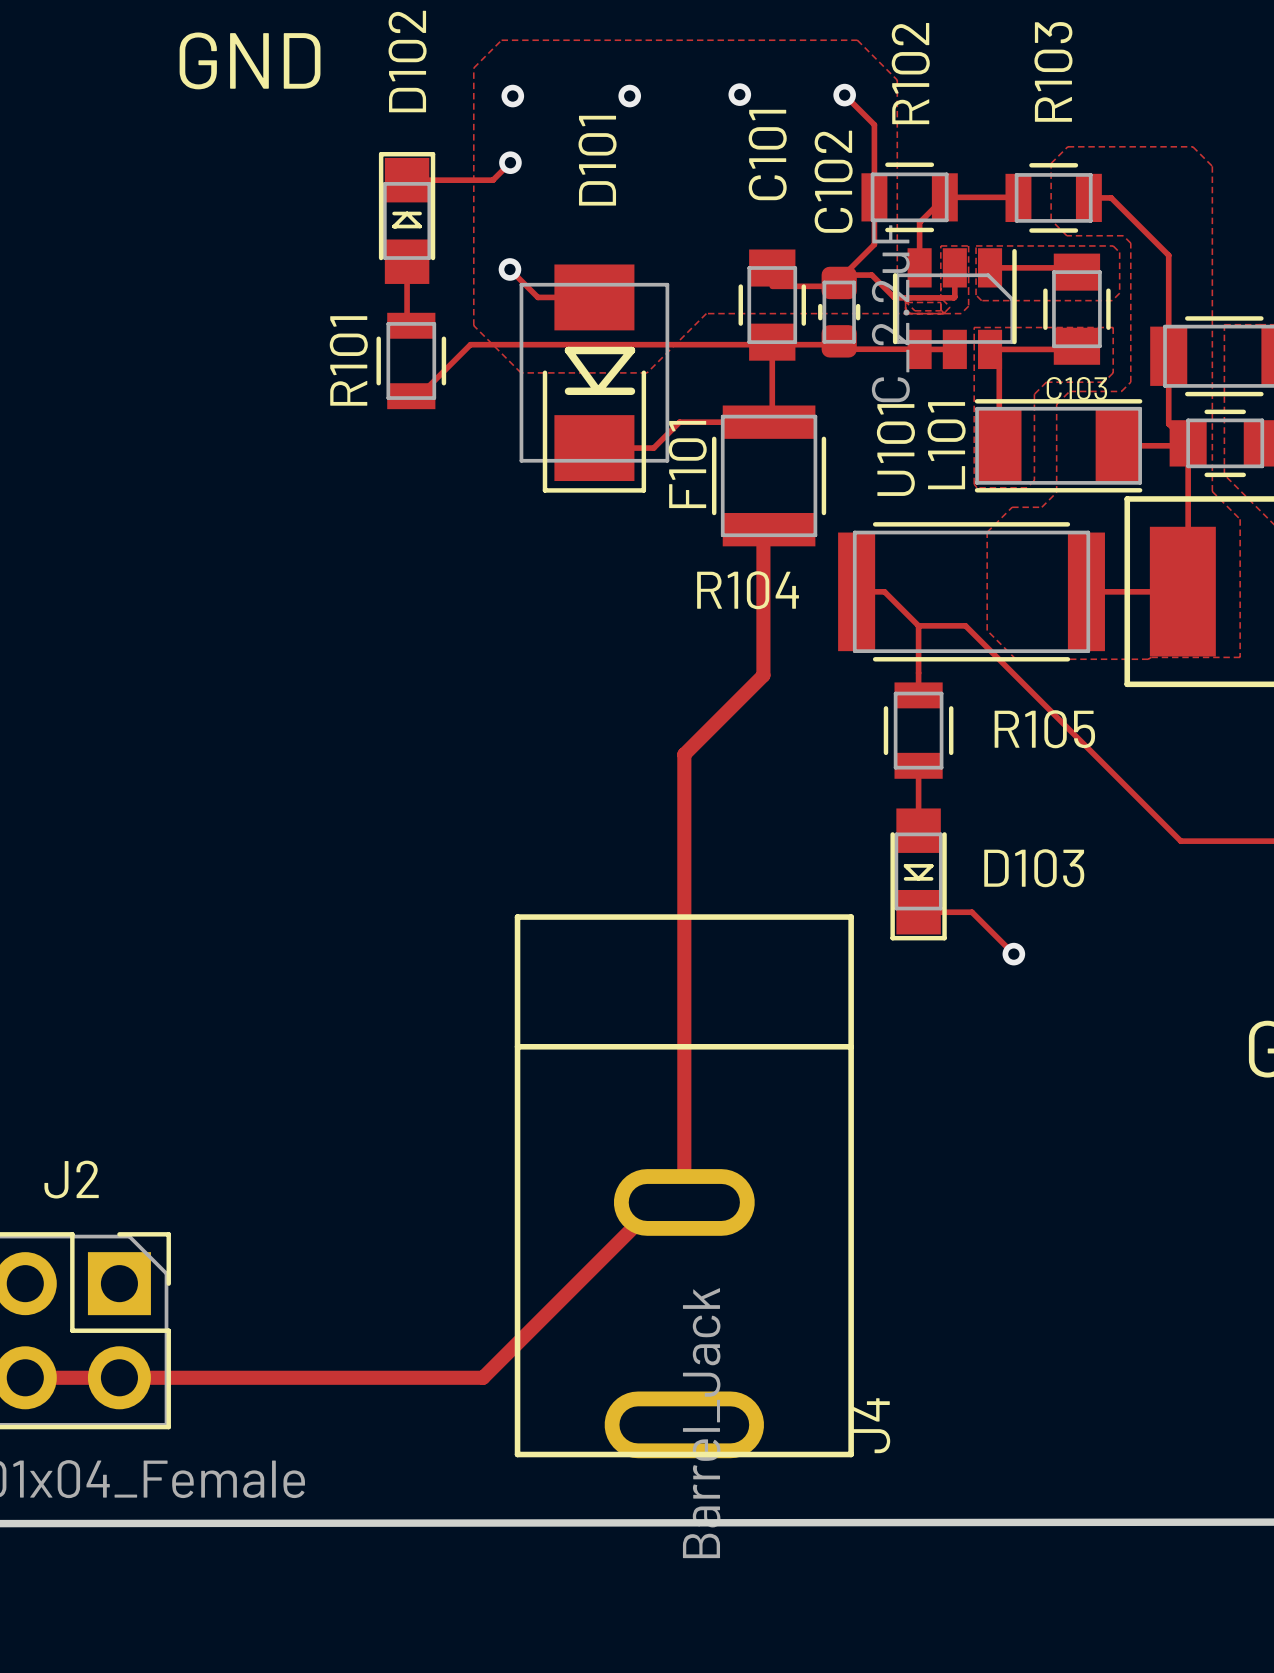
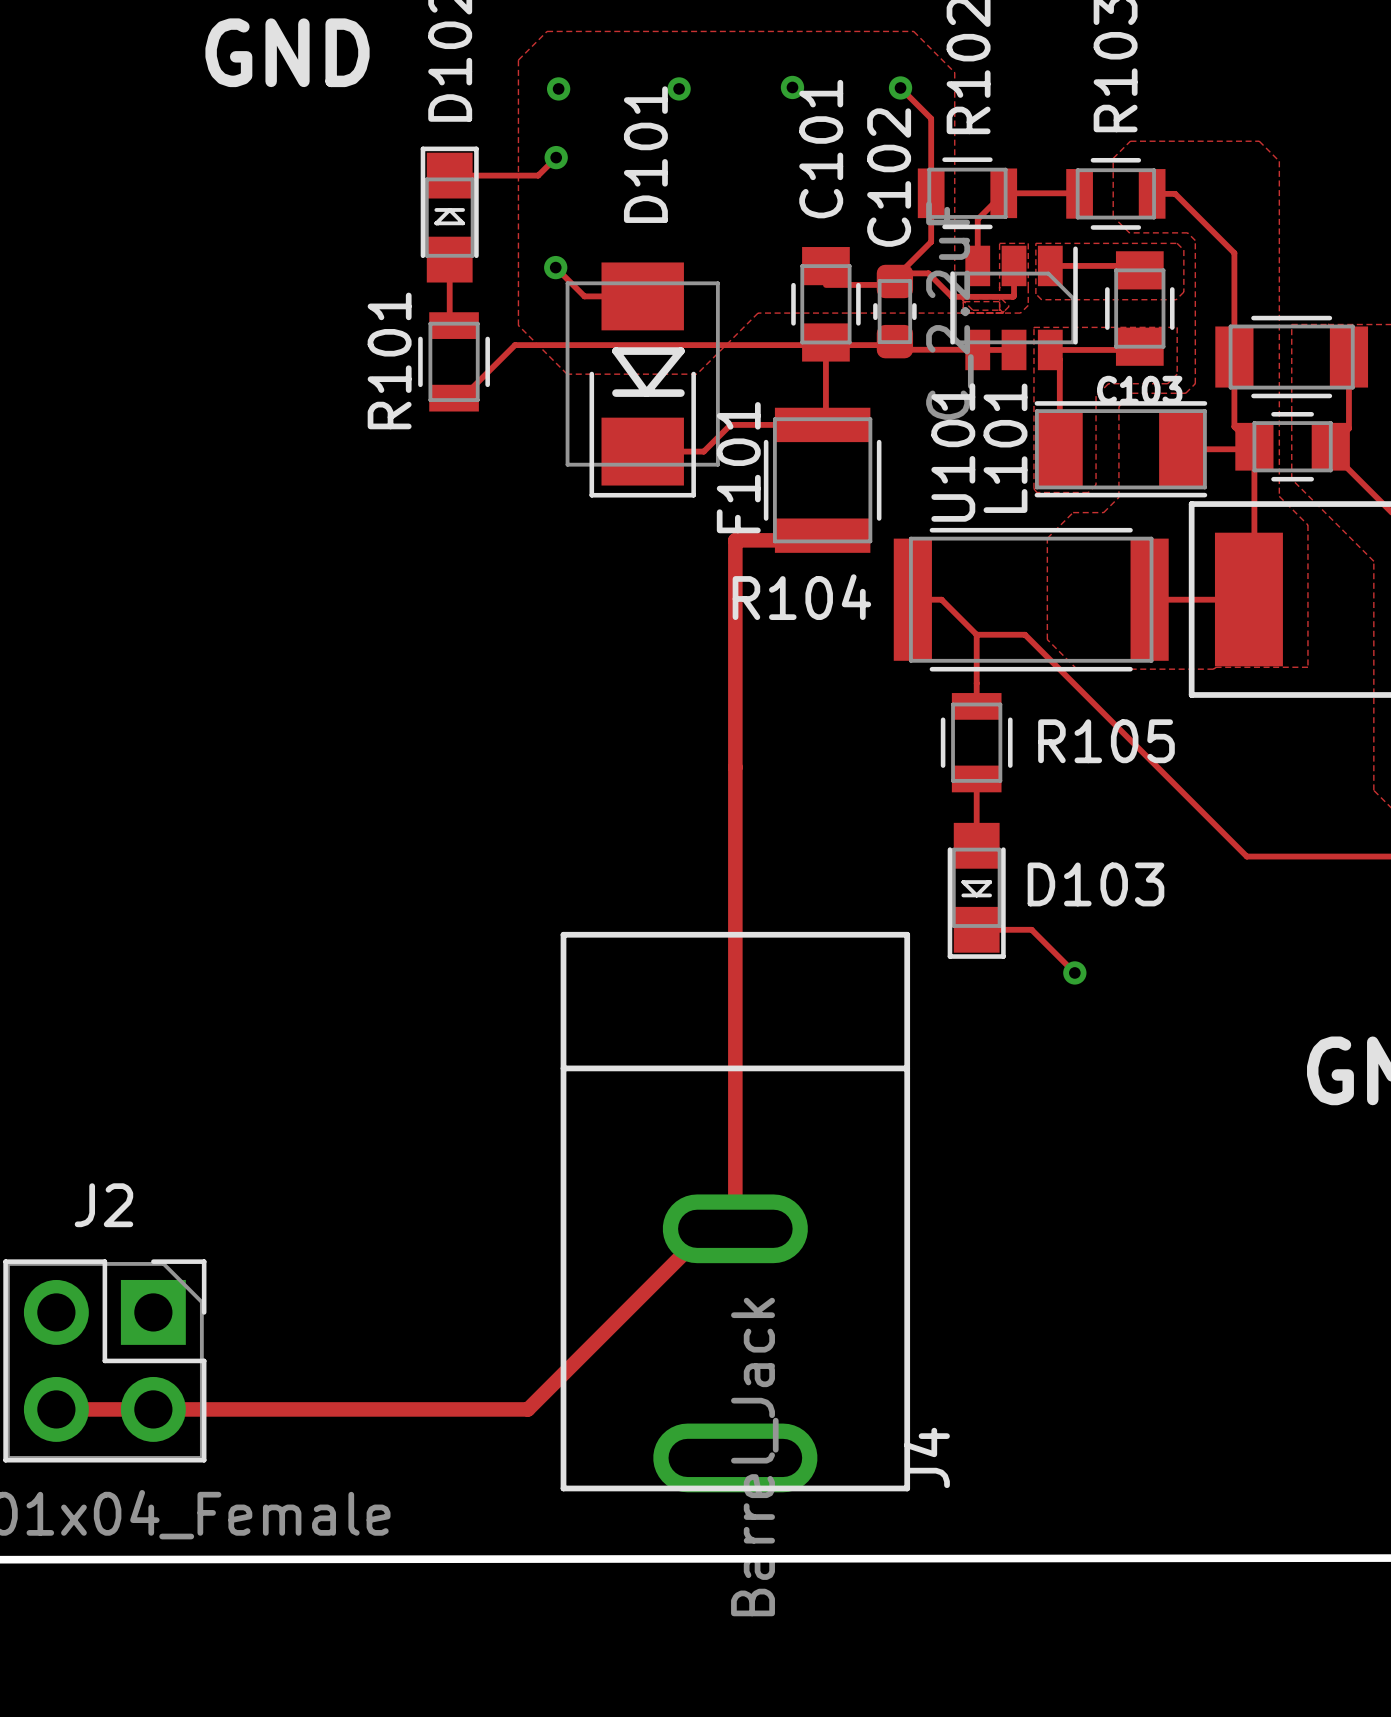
track: (763, 534) (763, 675) (684, 754) -> (816, 540) (735, 540) (735, 767)

